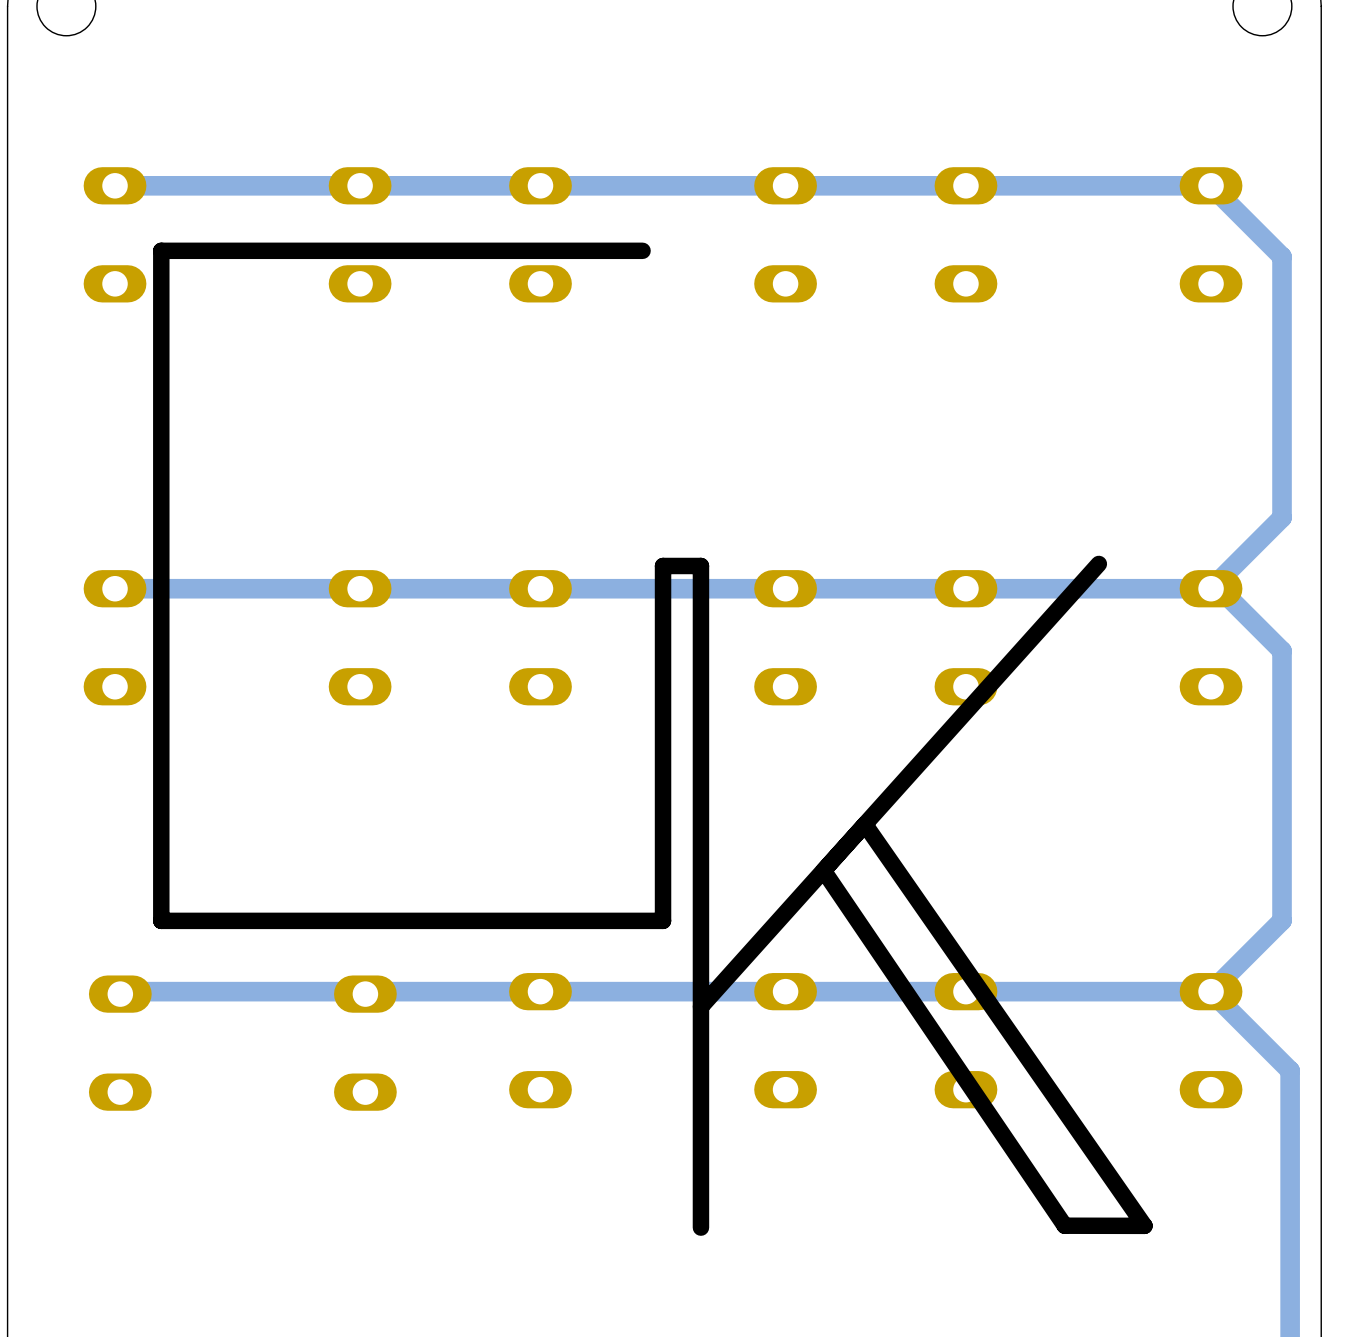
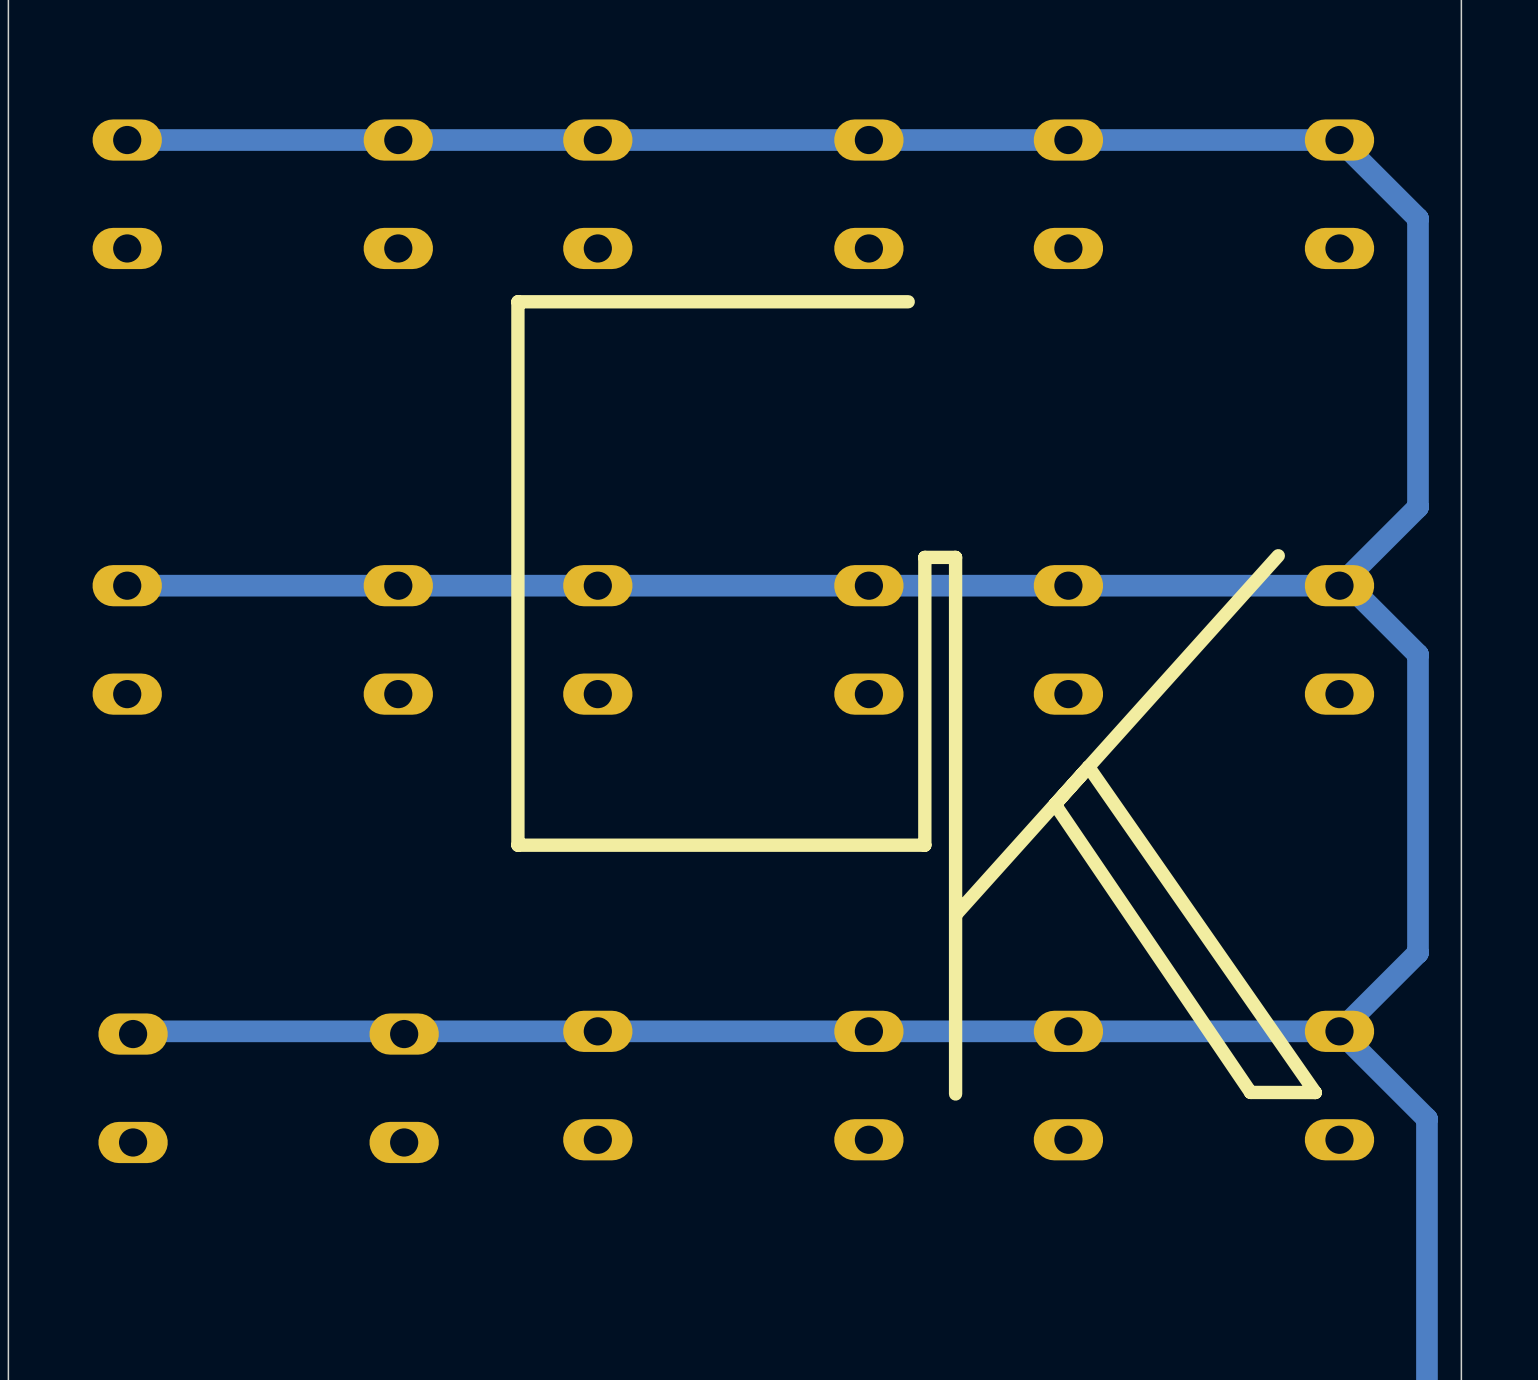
line: (642, 250) (161, 250) (161, 920) (663, 920) (663, 565) (700, 565) (700, 1227) -> none
line: none -> (908, 301) (517, 301) (517, 845) (924, 845) (924, 557) (955, 557) (955, 1093)
line: none -> (1278, 555) (955, 914)
line: (1098, 563) (701, 1006) -> none
line: none -> (1088, 767) (1315, 1092) (1250, 1092) (1055, 804) (1088, 767)
line: (865, 824) (1144, 1225) (1064, 1225) (823, 870) (865, 824) -> none

